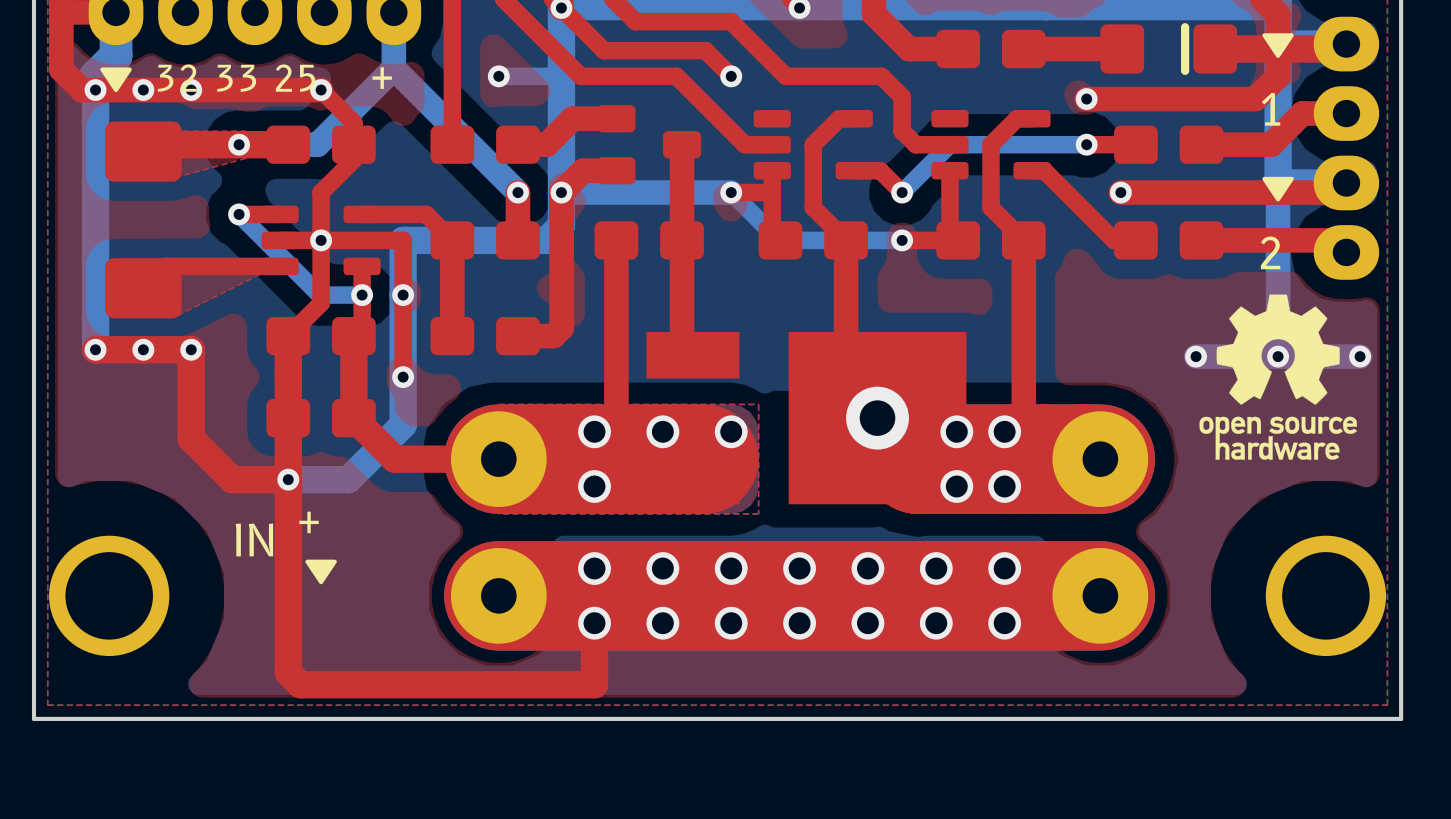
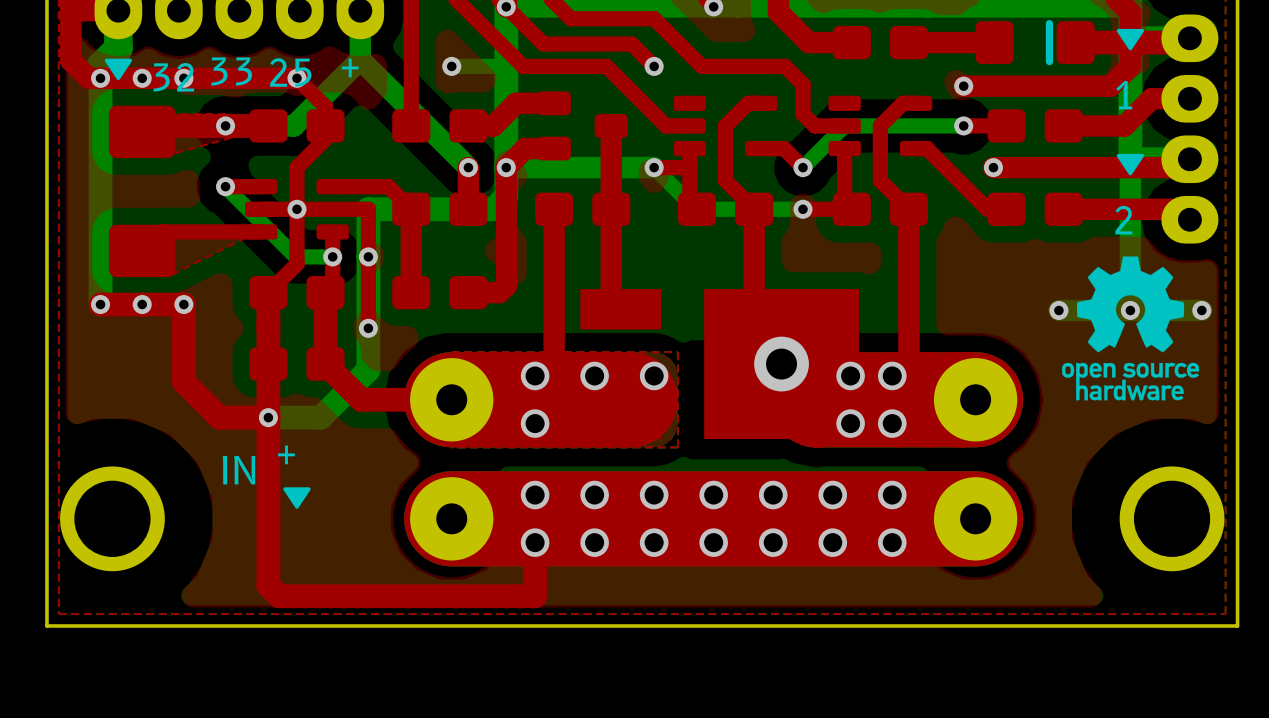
text: 32 33 25 (236, 78) -> 32 (173, 77)
text: none -> 33 (231, 71)
text: none -> 25 (290, 72)

